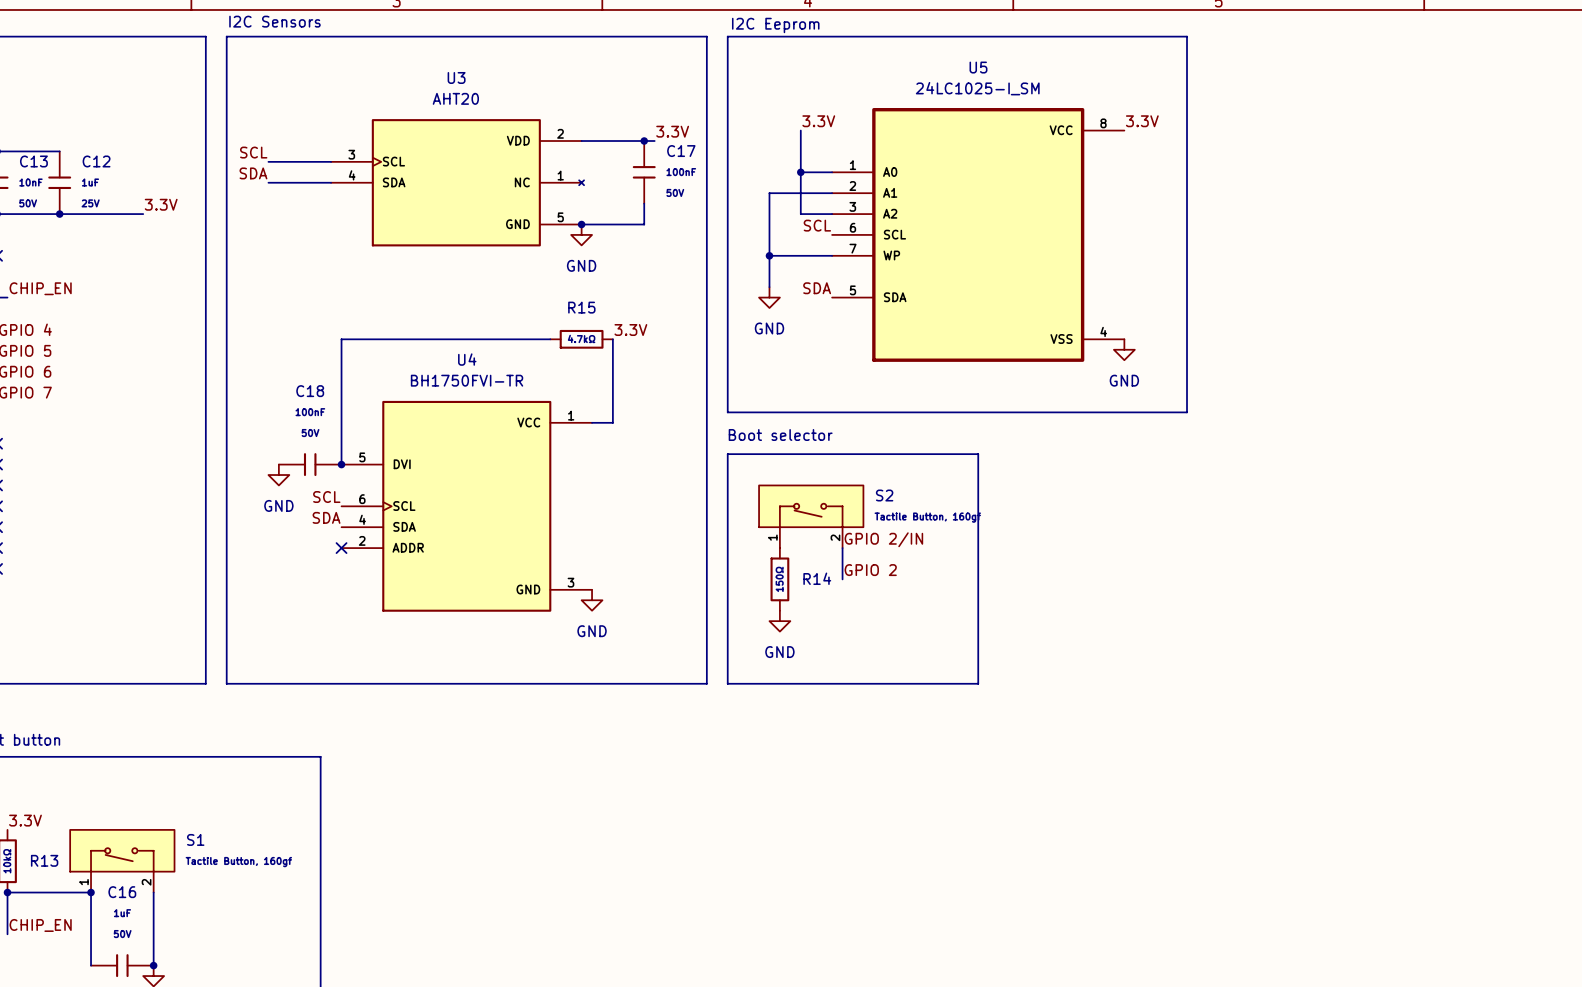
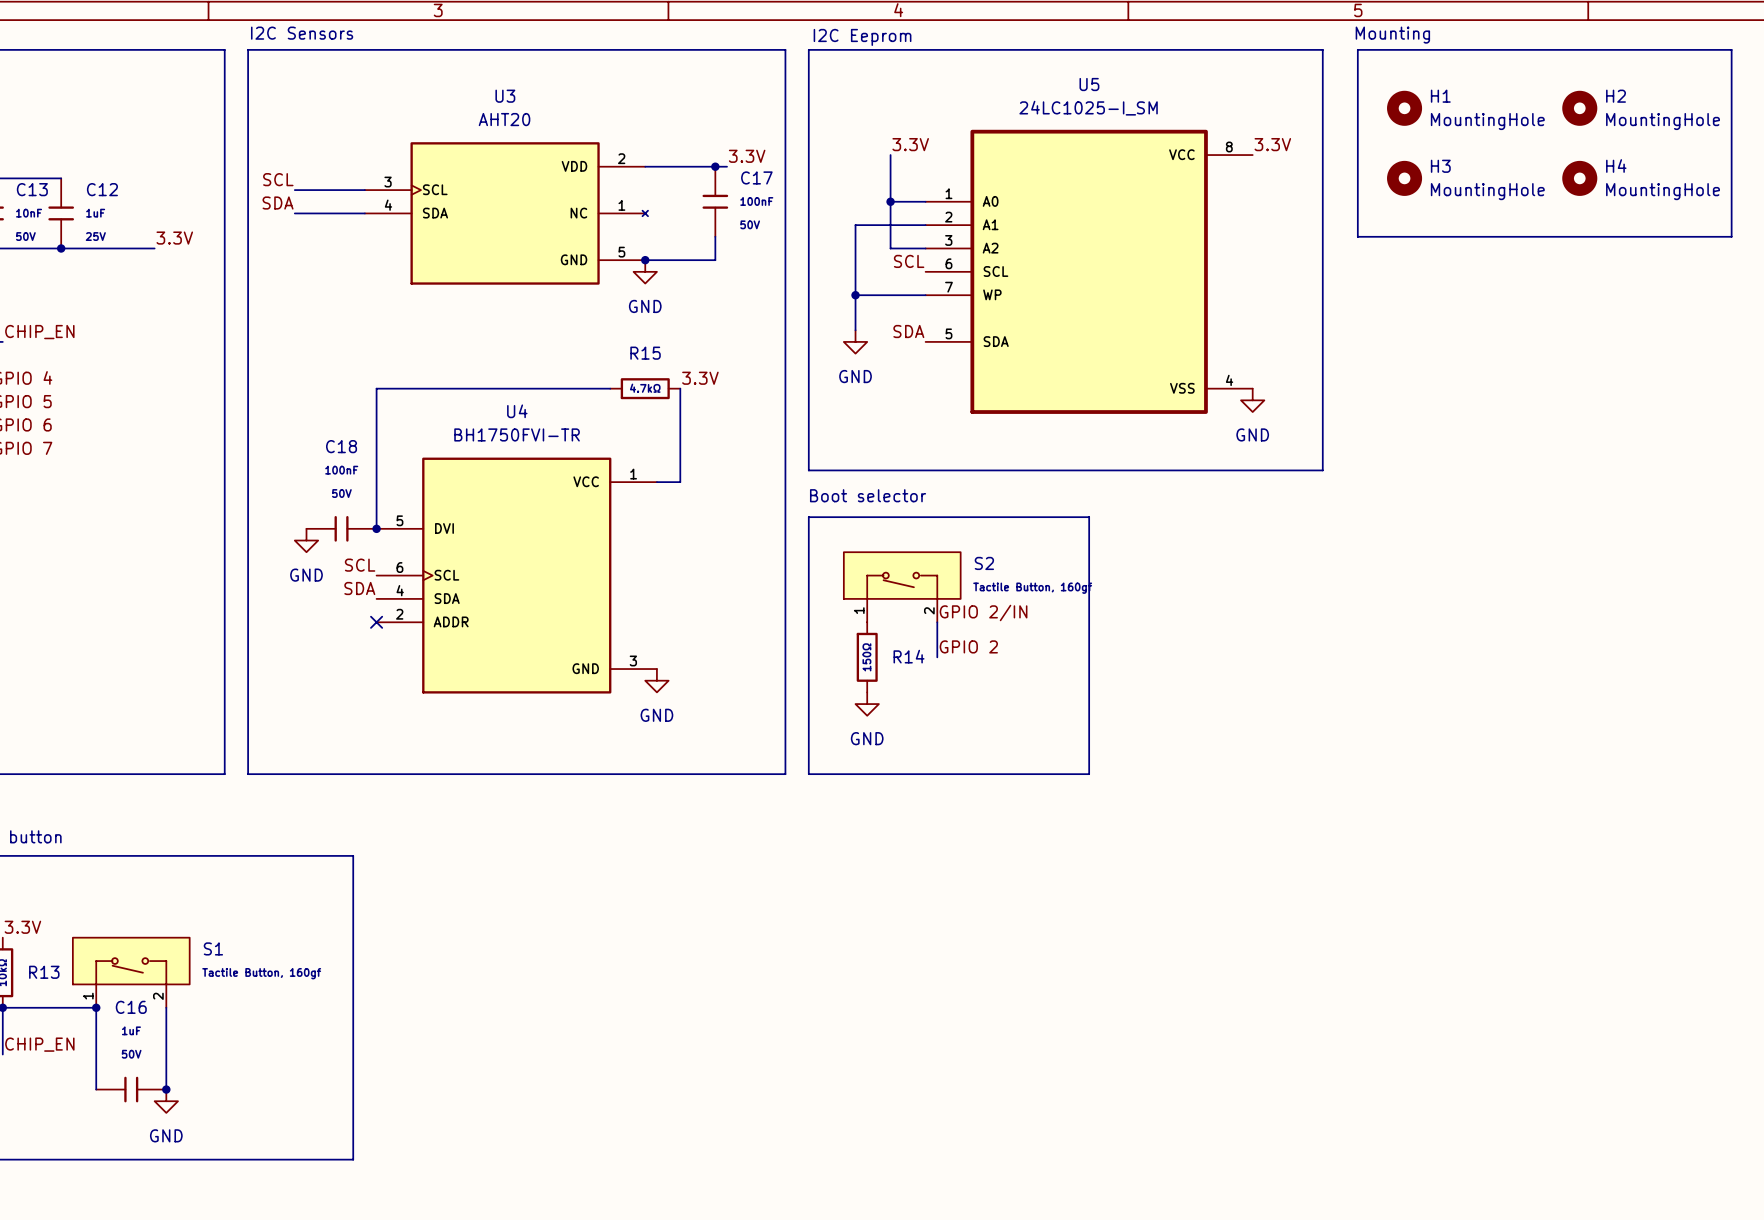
text: none -> Mounting (1392, 35)
line: none -> (1357, 49) (1731, 49) (1731, 236) (1357, 236) (1357, 49)
H1: none -> MountingHole (1404, 108)
H2: none -> MountingHole (1579, 108)
H3: none -> MountingHole (1404, 178)
H4: none -> MountingHole (1579, 178)

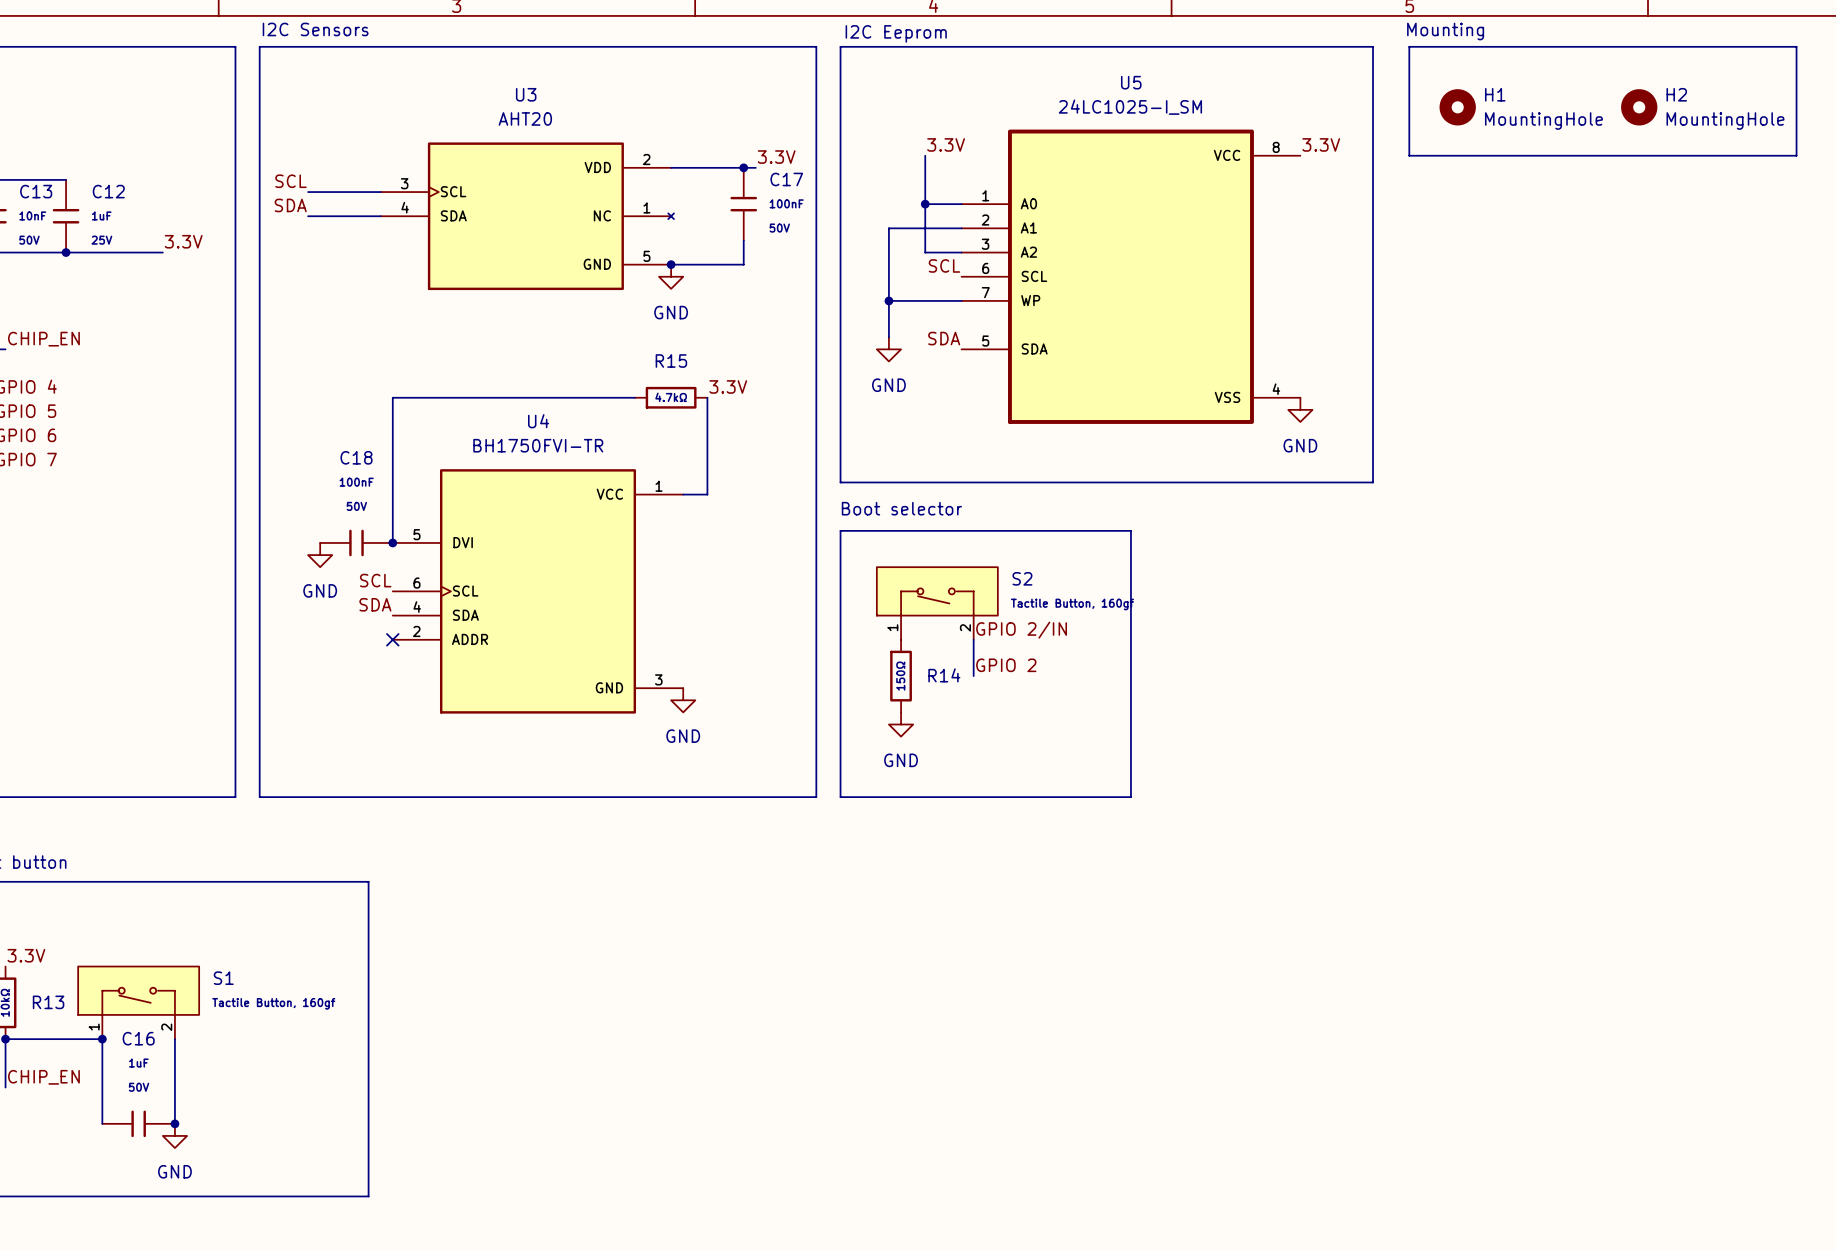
line: (1357, 155) (1357, 236) (1731, 236) (1731, 155) -> (1409, 155) (1796, 155)
H3: MountingHole (1404, 178) -> none
H4: MountingHole (1579, 178) -> none

